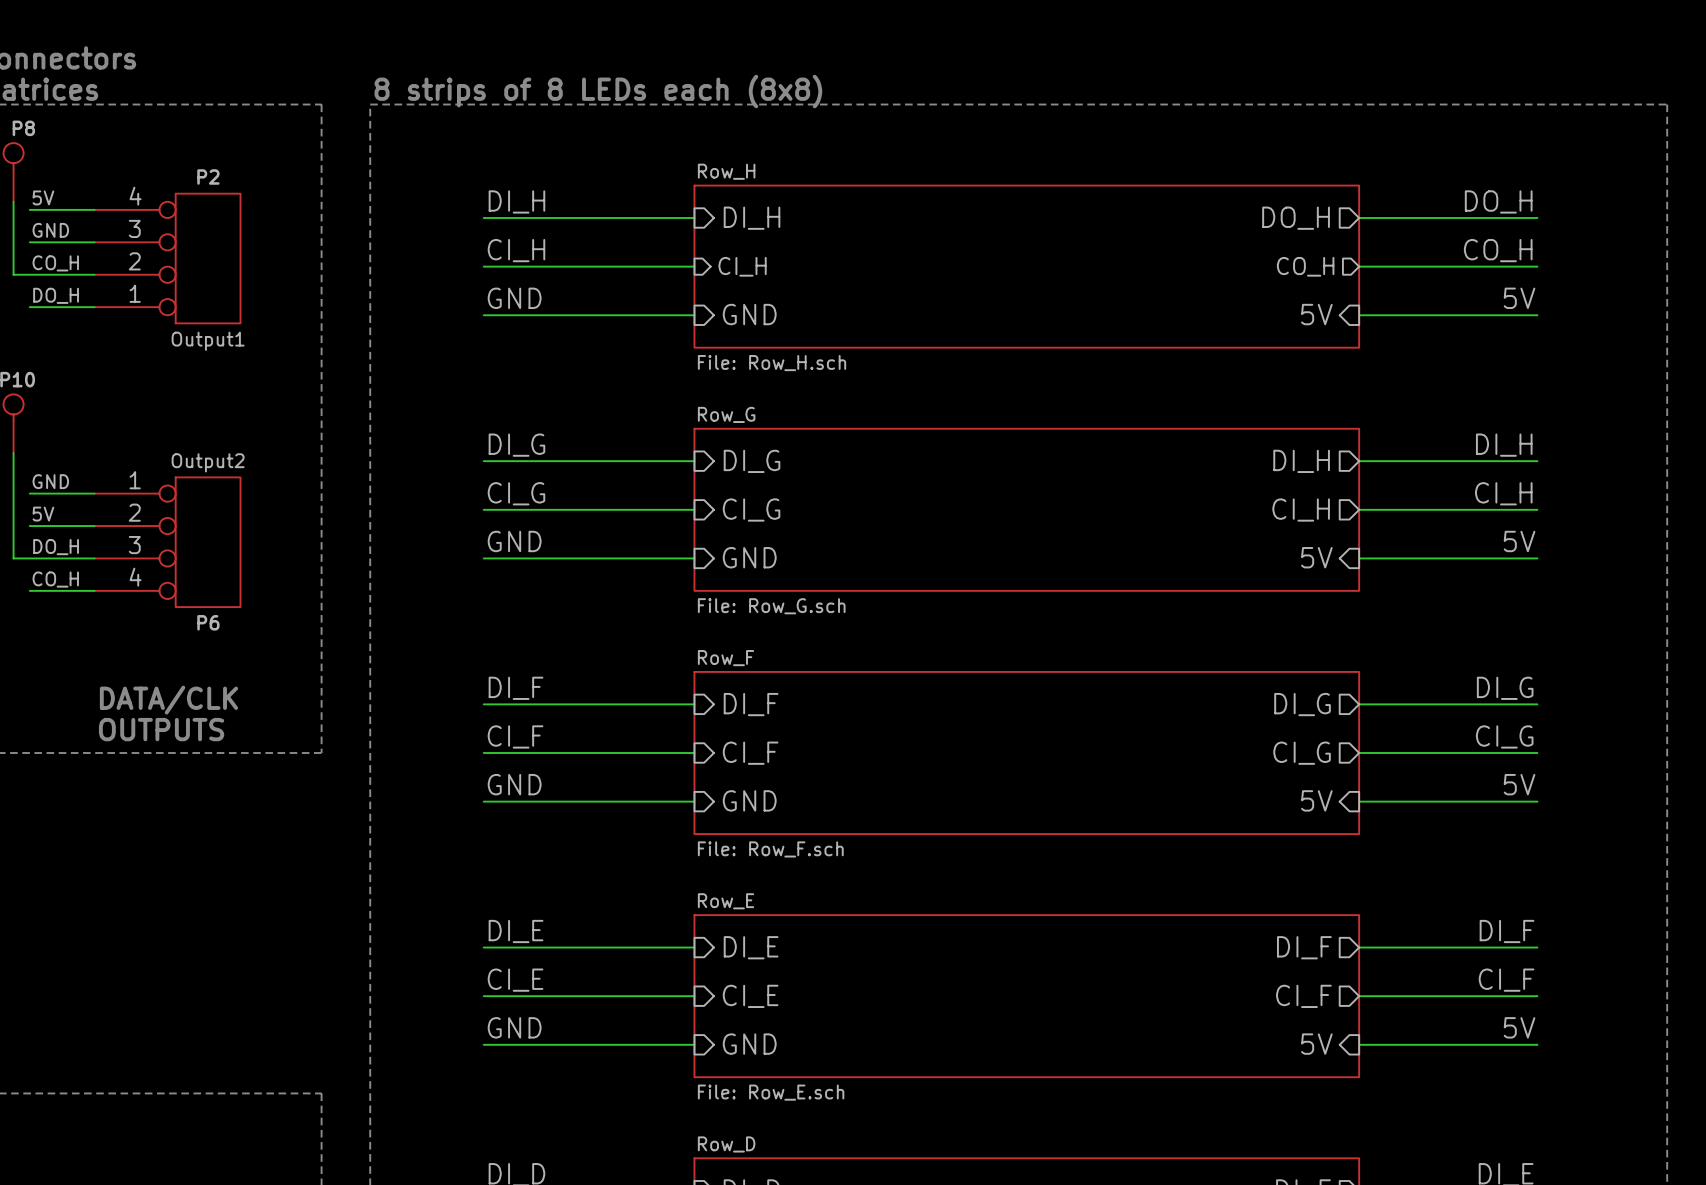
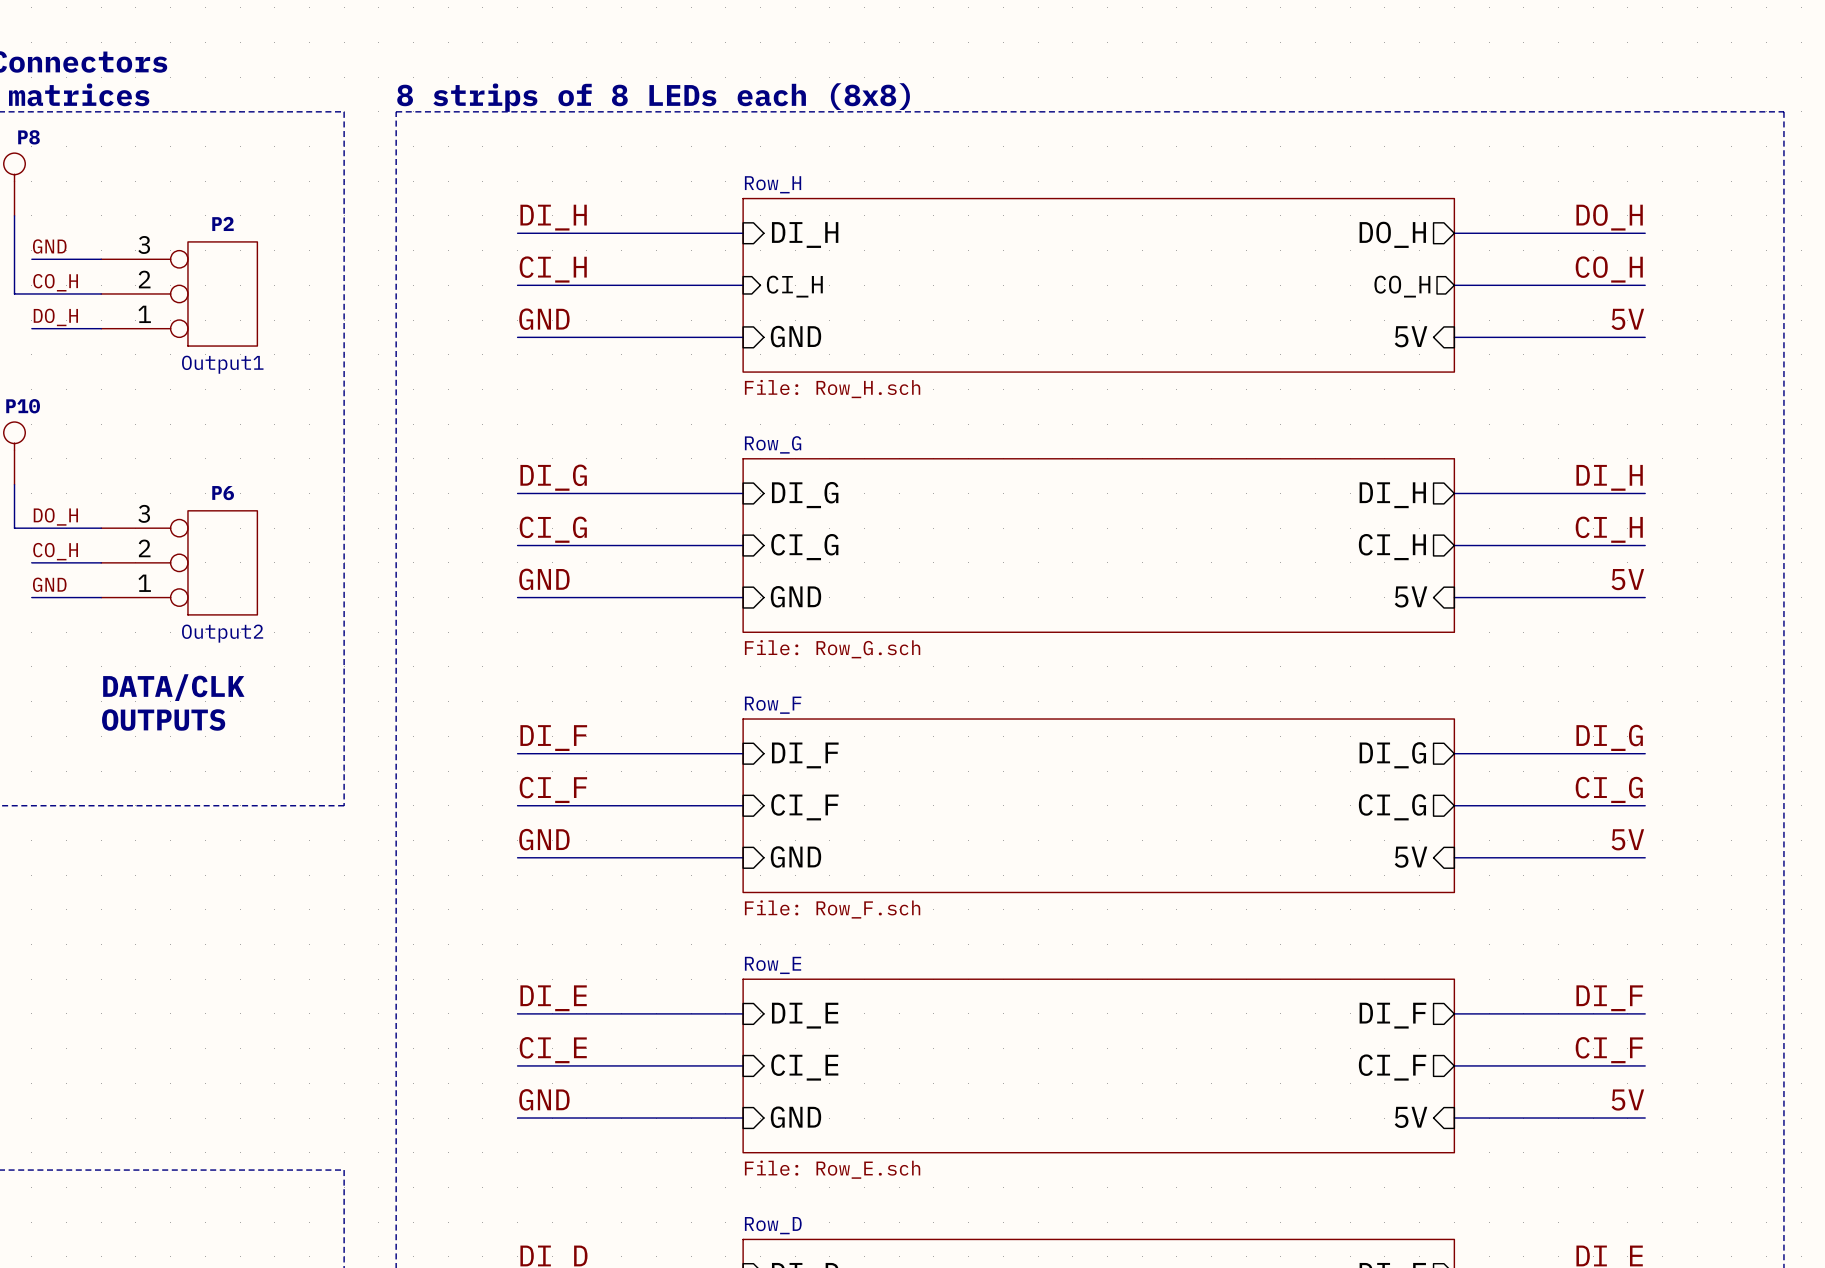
P2 symbol: [94, 193, 241, 324] -> [101, 241, 258, 347]
label: 5V (43, 197) -> none
wire: (29, 209) (94, 209) -> none
P6 value position: Output2 (208, 462) -> Output2 (222, 633)
P6 symbol: [94, 477, 241, 608] -> [101, 510, 258, 615]
label: GND (50, 481) -> DO_H (55, 516)
wire: (13, 493) (13, 558) (29, 558) -> (14, 528) (31, 528)
label: 5V (43, 514) -> CO_H (55, 551)
label: DO_H (56, 547) -> GND (49, 584)
label: CO_H (55, 579) -> none
wire: (29, 590) (94, 590) -> none
P6 name position: P6 (208, 622) -> P6 (223, 493)
text position: DATA/CLK (168, 700) -> DATA/CLK (173, 687)
text position: OUTPUTS (161, 729) -> OUTPUTS (163, 719)

